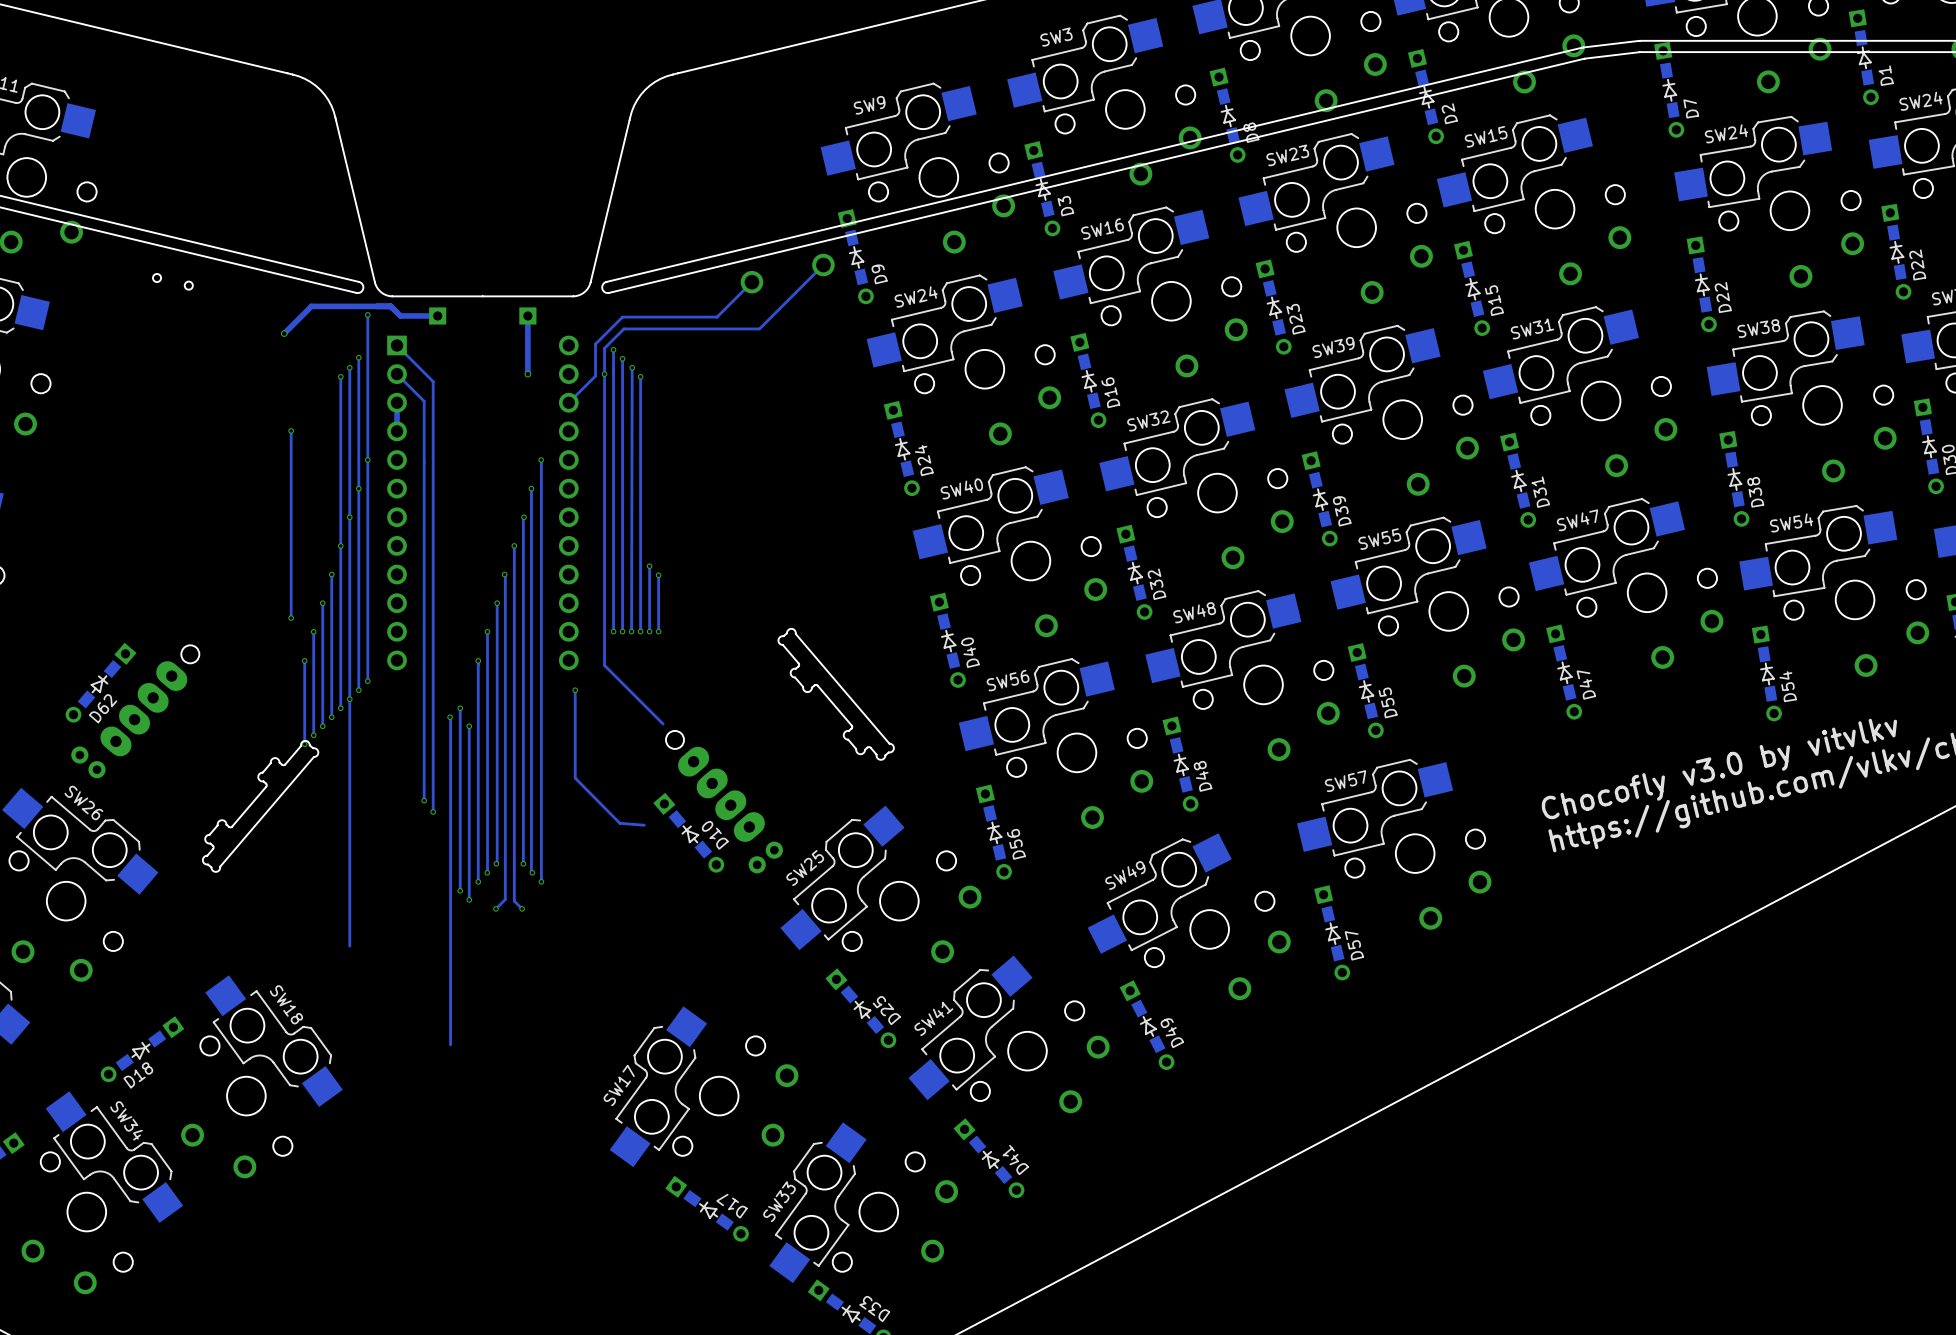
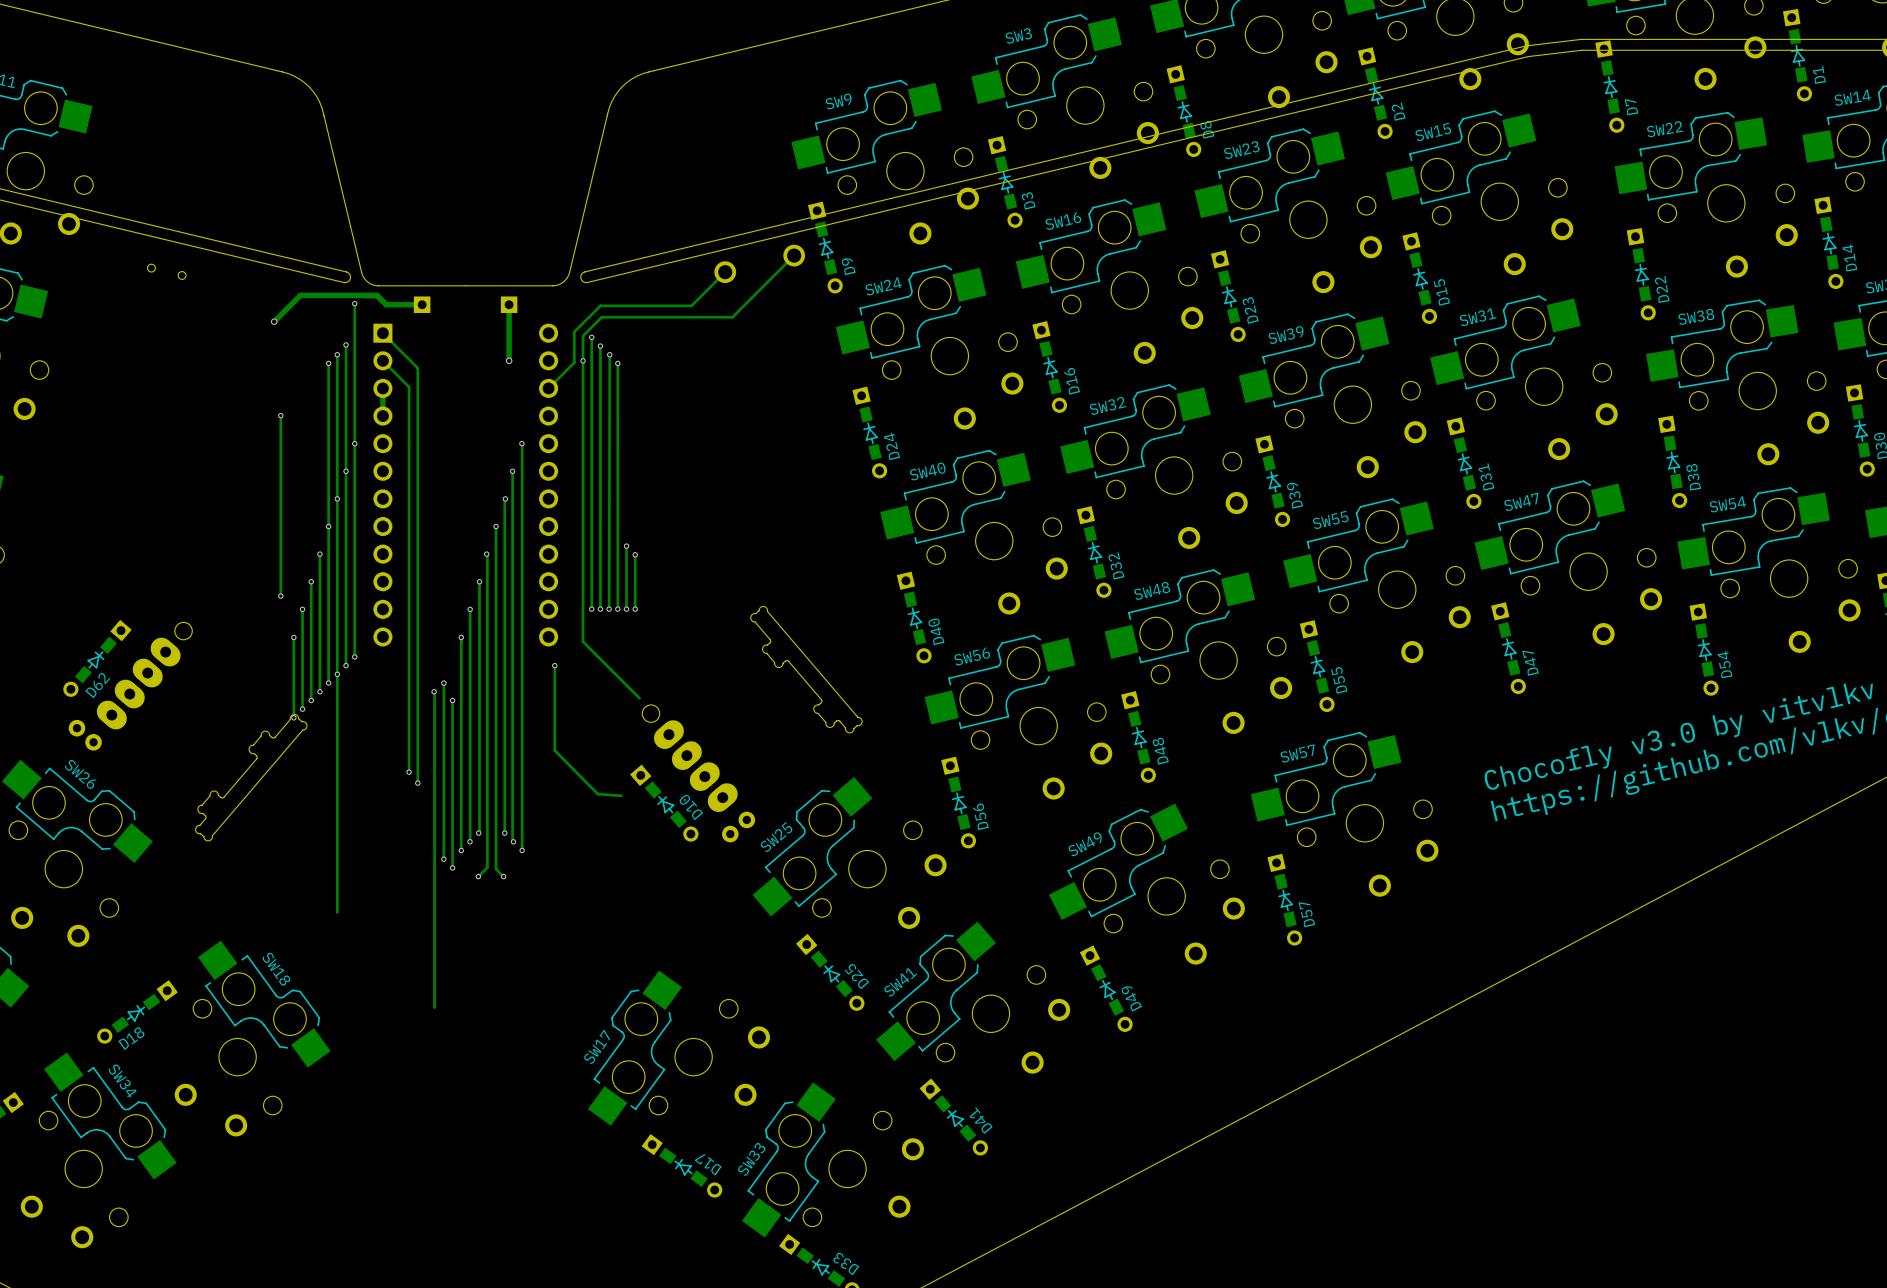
SW24 name: SW24 (1920, 101) -> SW14 (1852, 97)
SW24 name: SW24 (1726, 133) -> SW22 (1665, 129)
D22 name: D22 (1917, 264) -> D14 (1849, 258)

